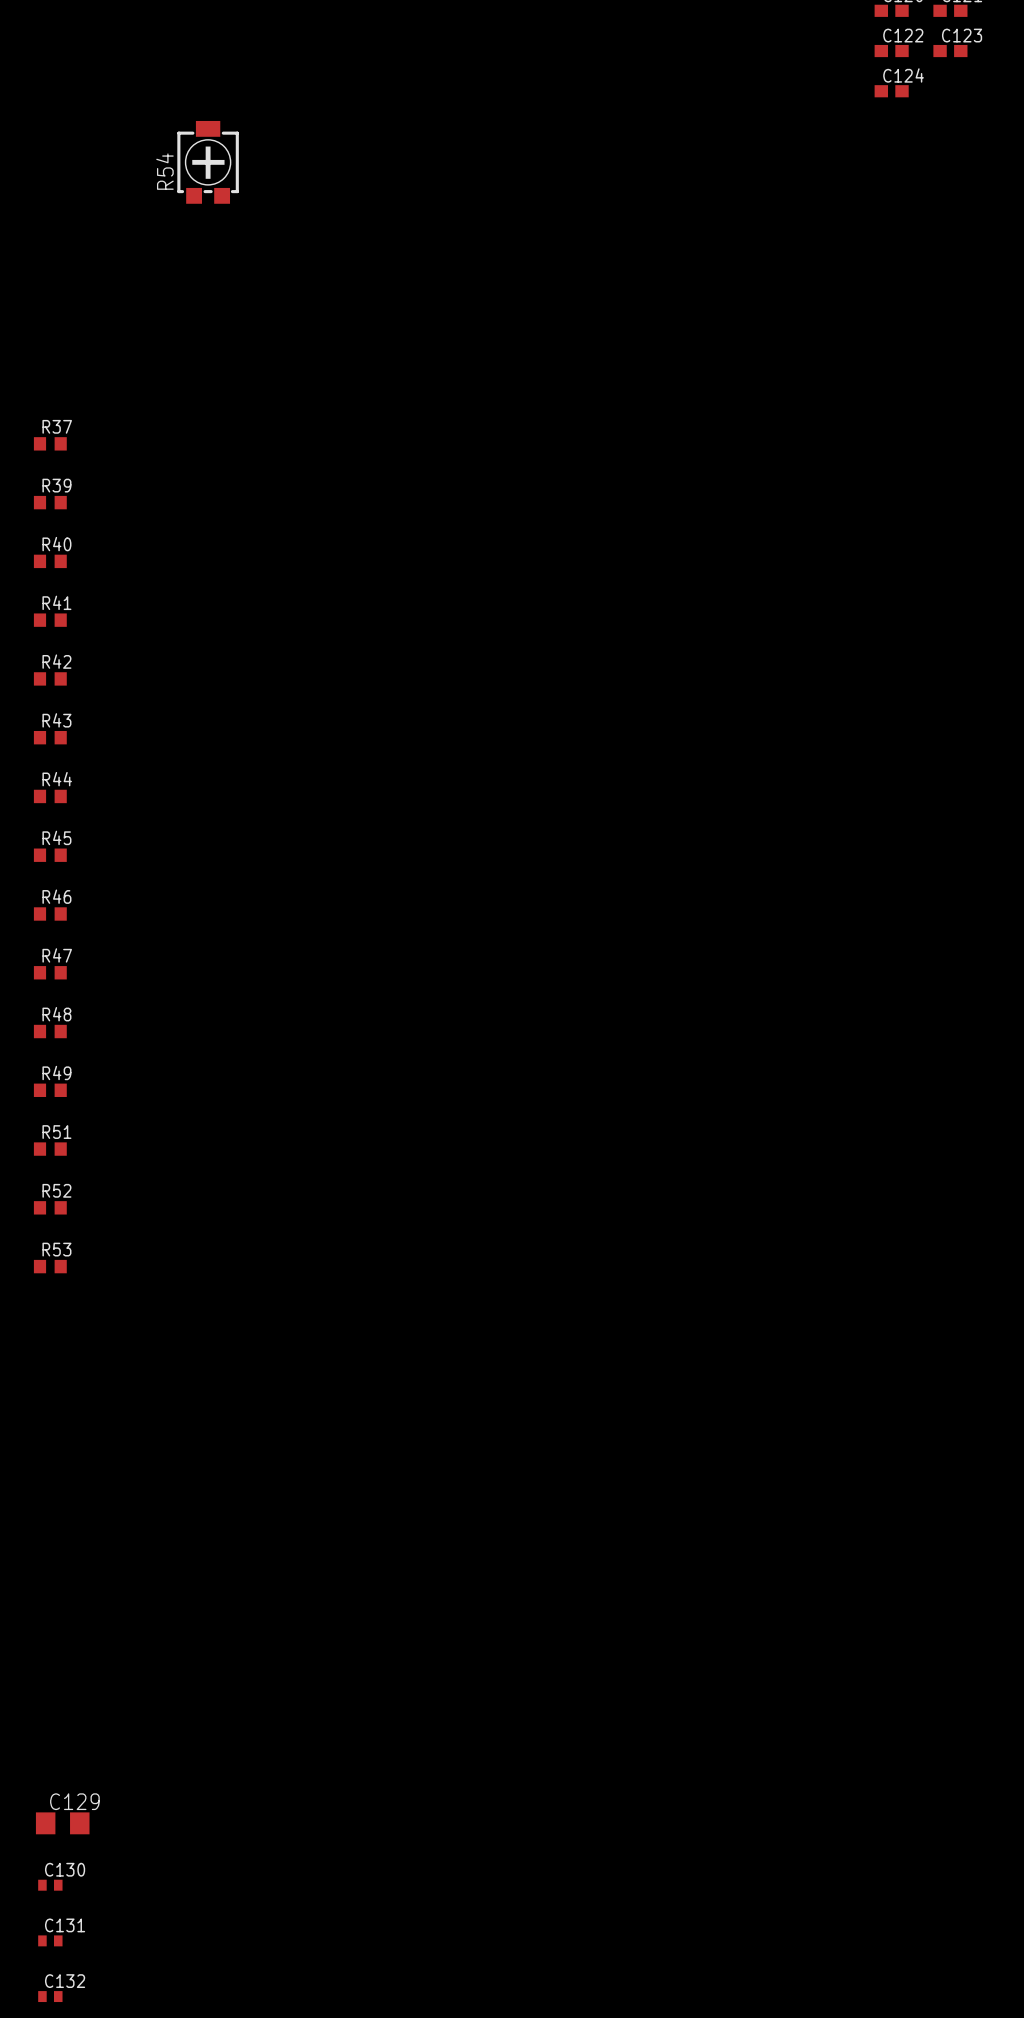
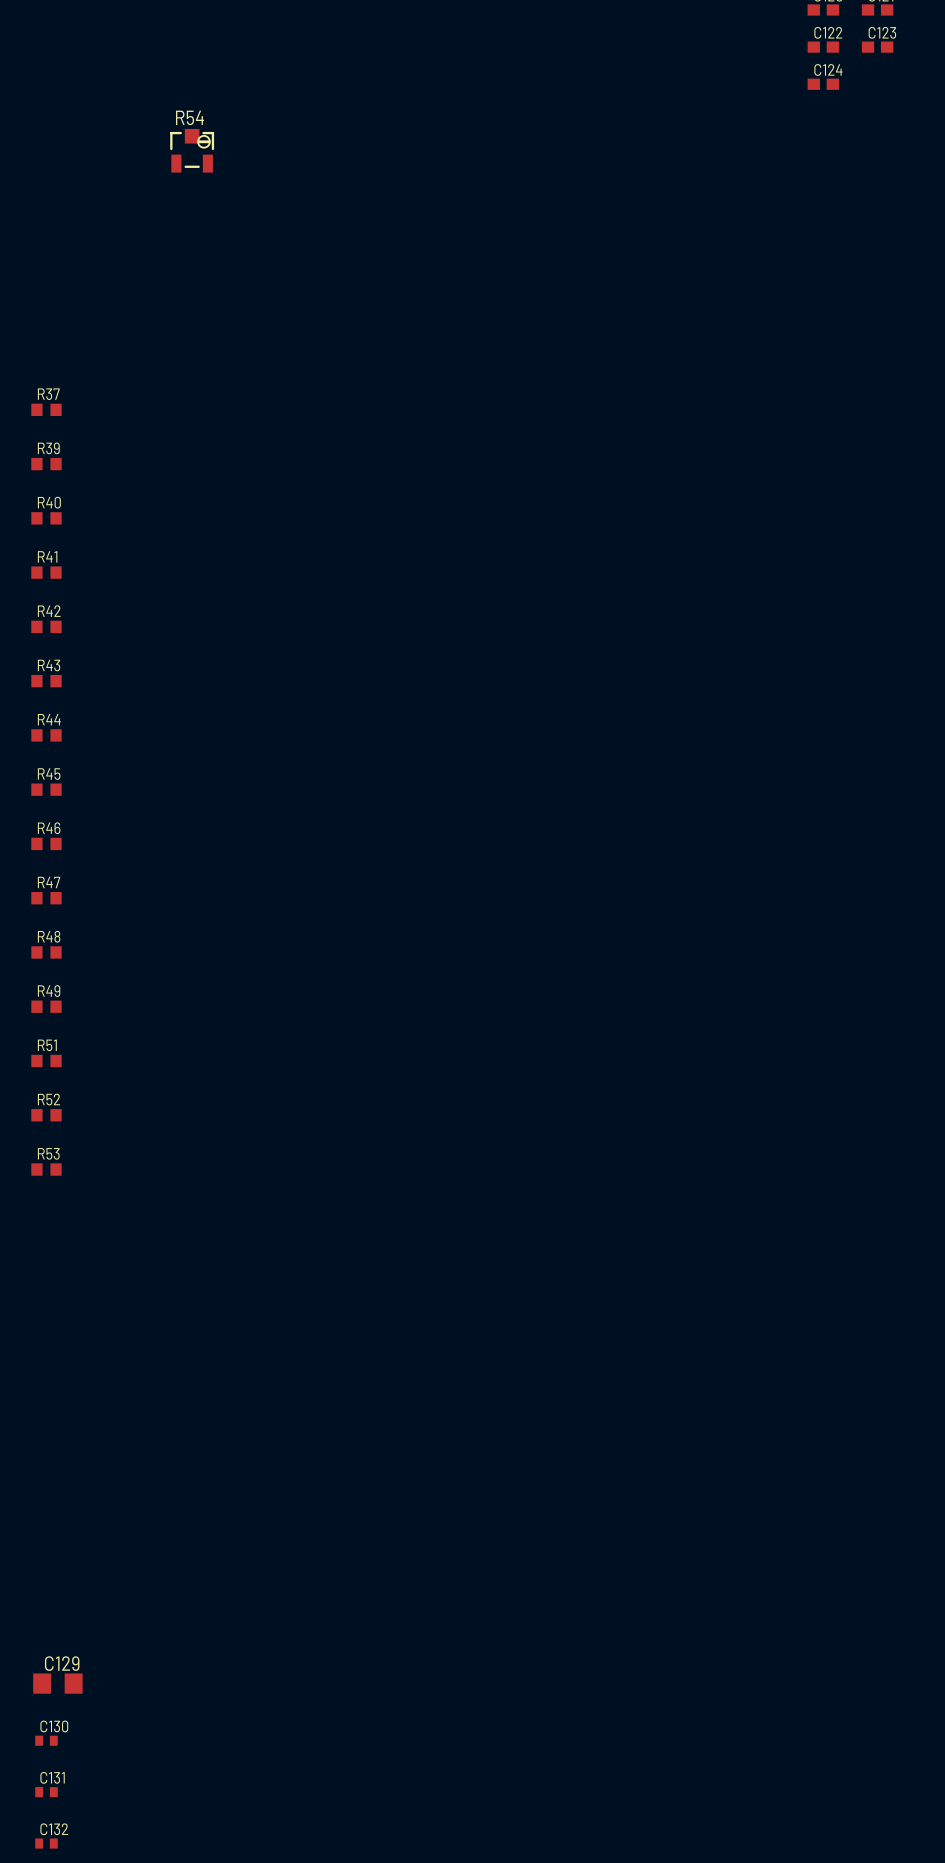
R54 footprint: [177, 120, 239, 204] -> [170, 128, 215, 173]
R54 name position: R54 (164, 171) -> R54 (189, 117)

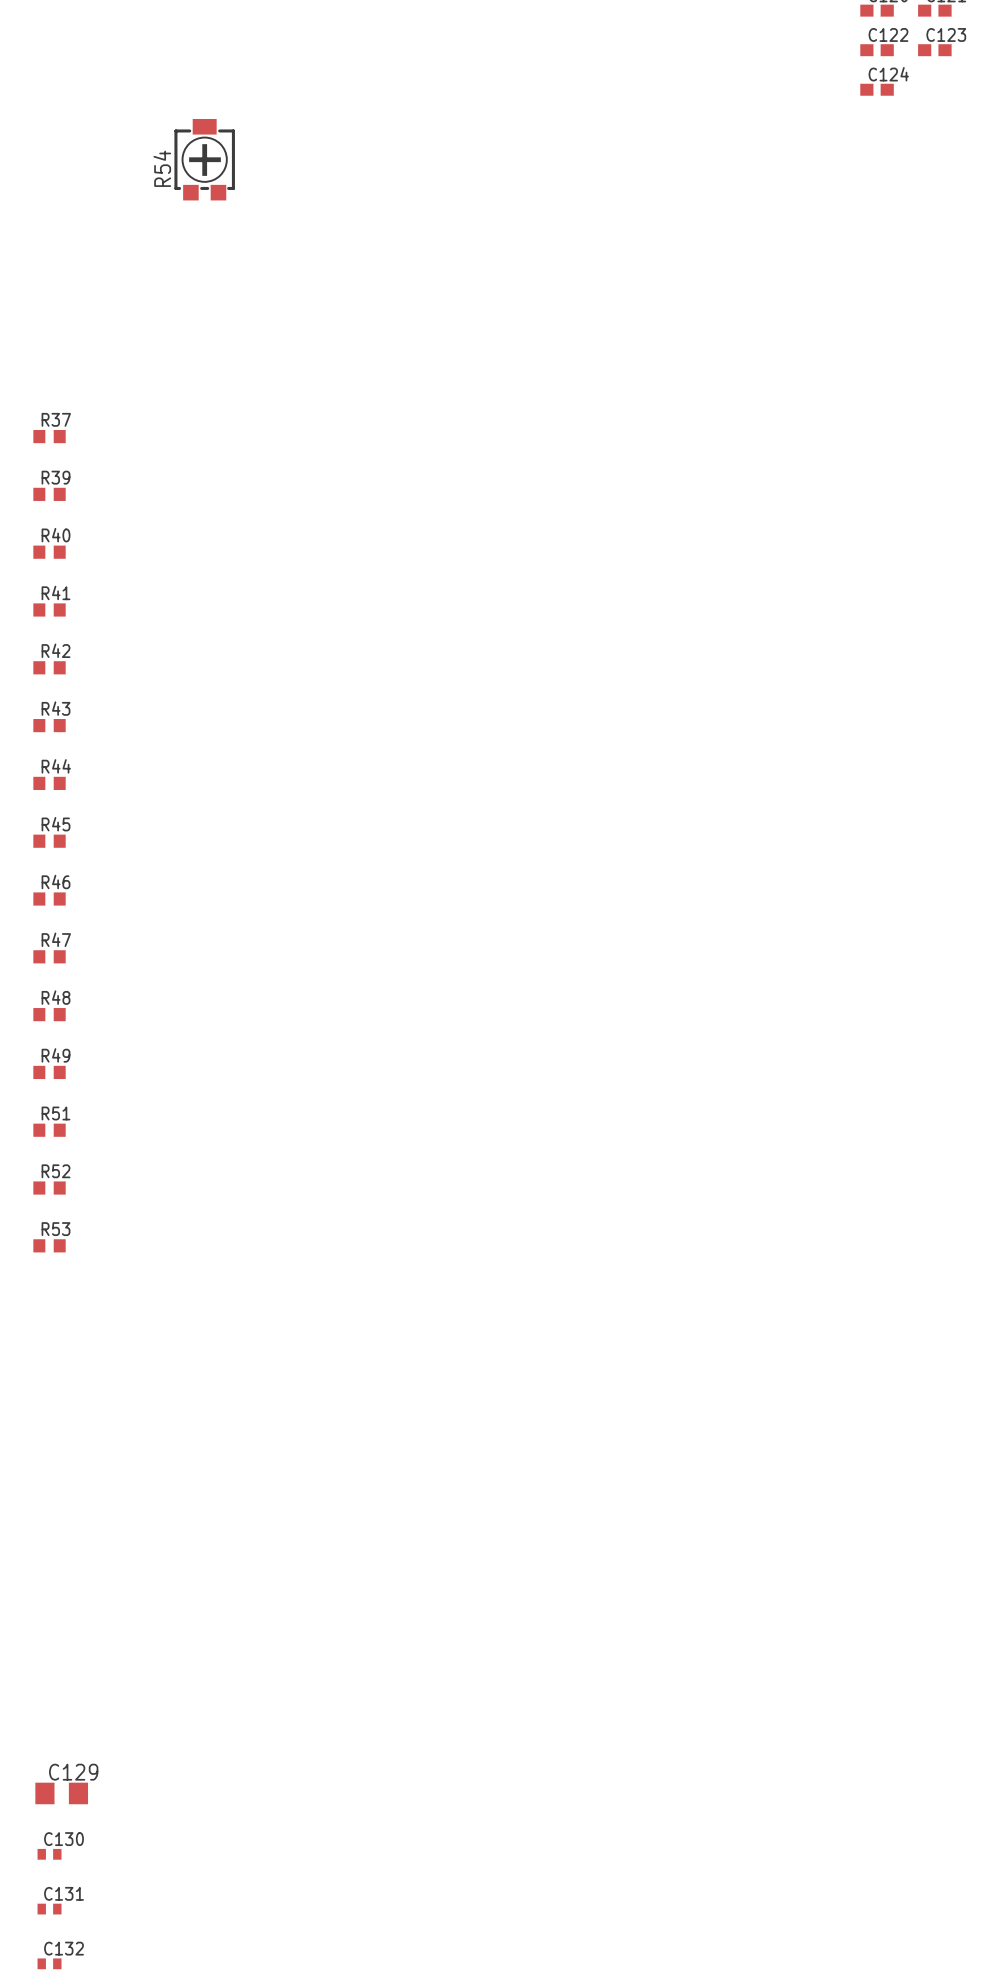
R54 name position: R54 (189, 117) -> R54 (162, 168)
R54 footprint: [170, 128, 215, 173] -> [174, 118, 235, 201]

